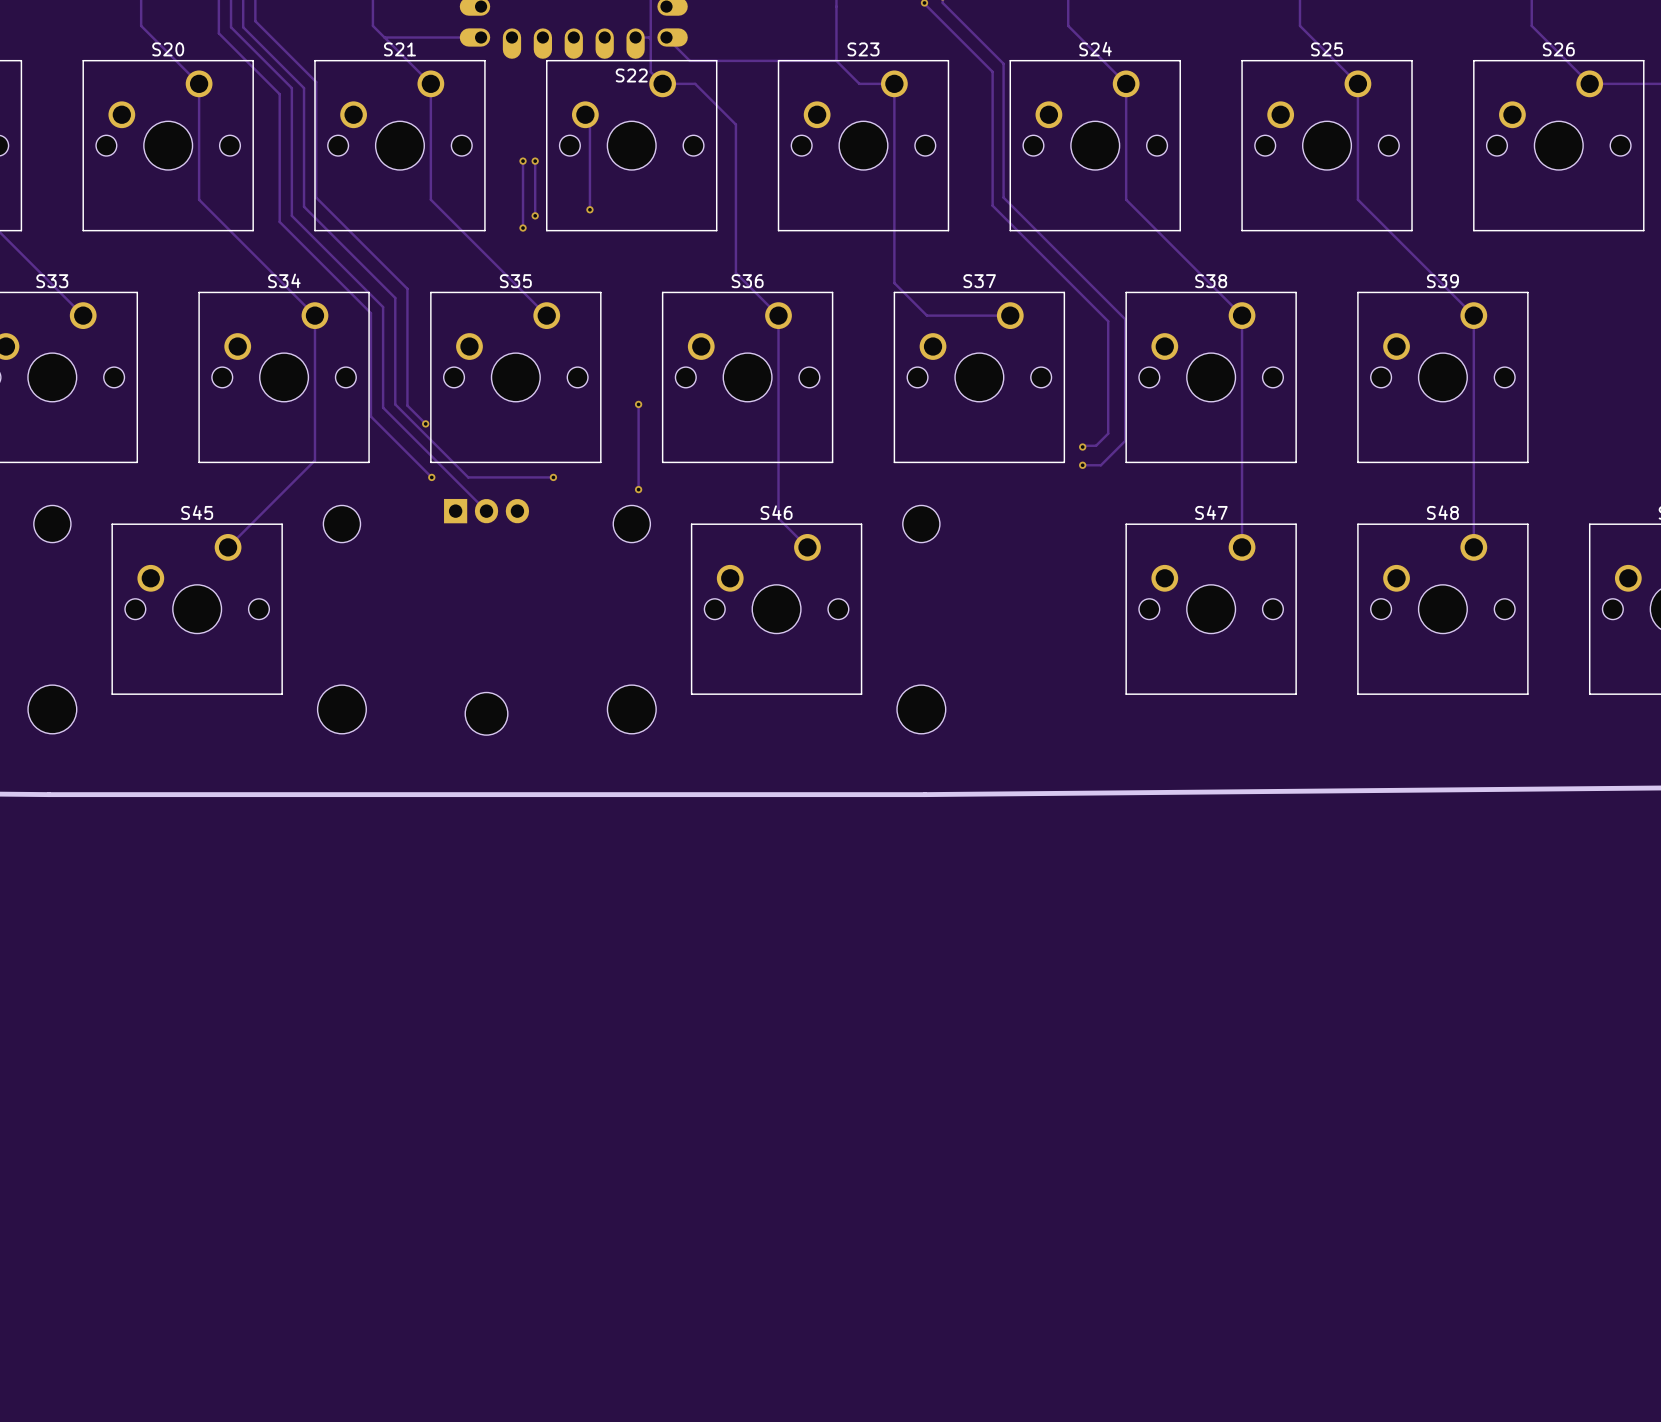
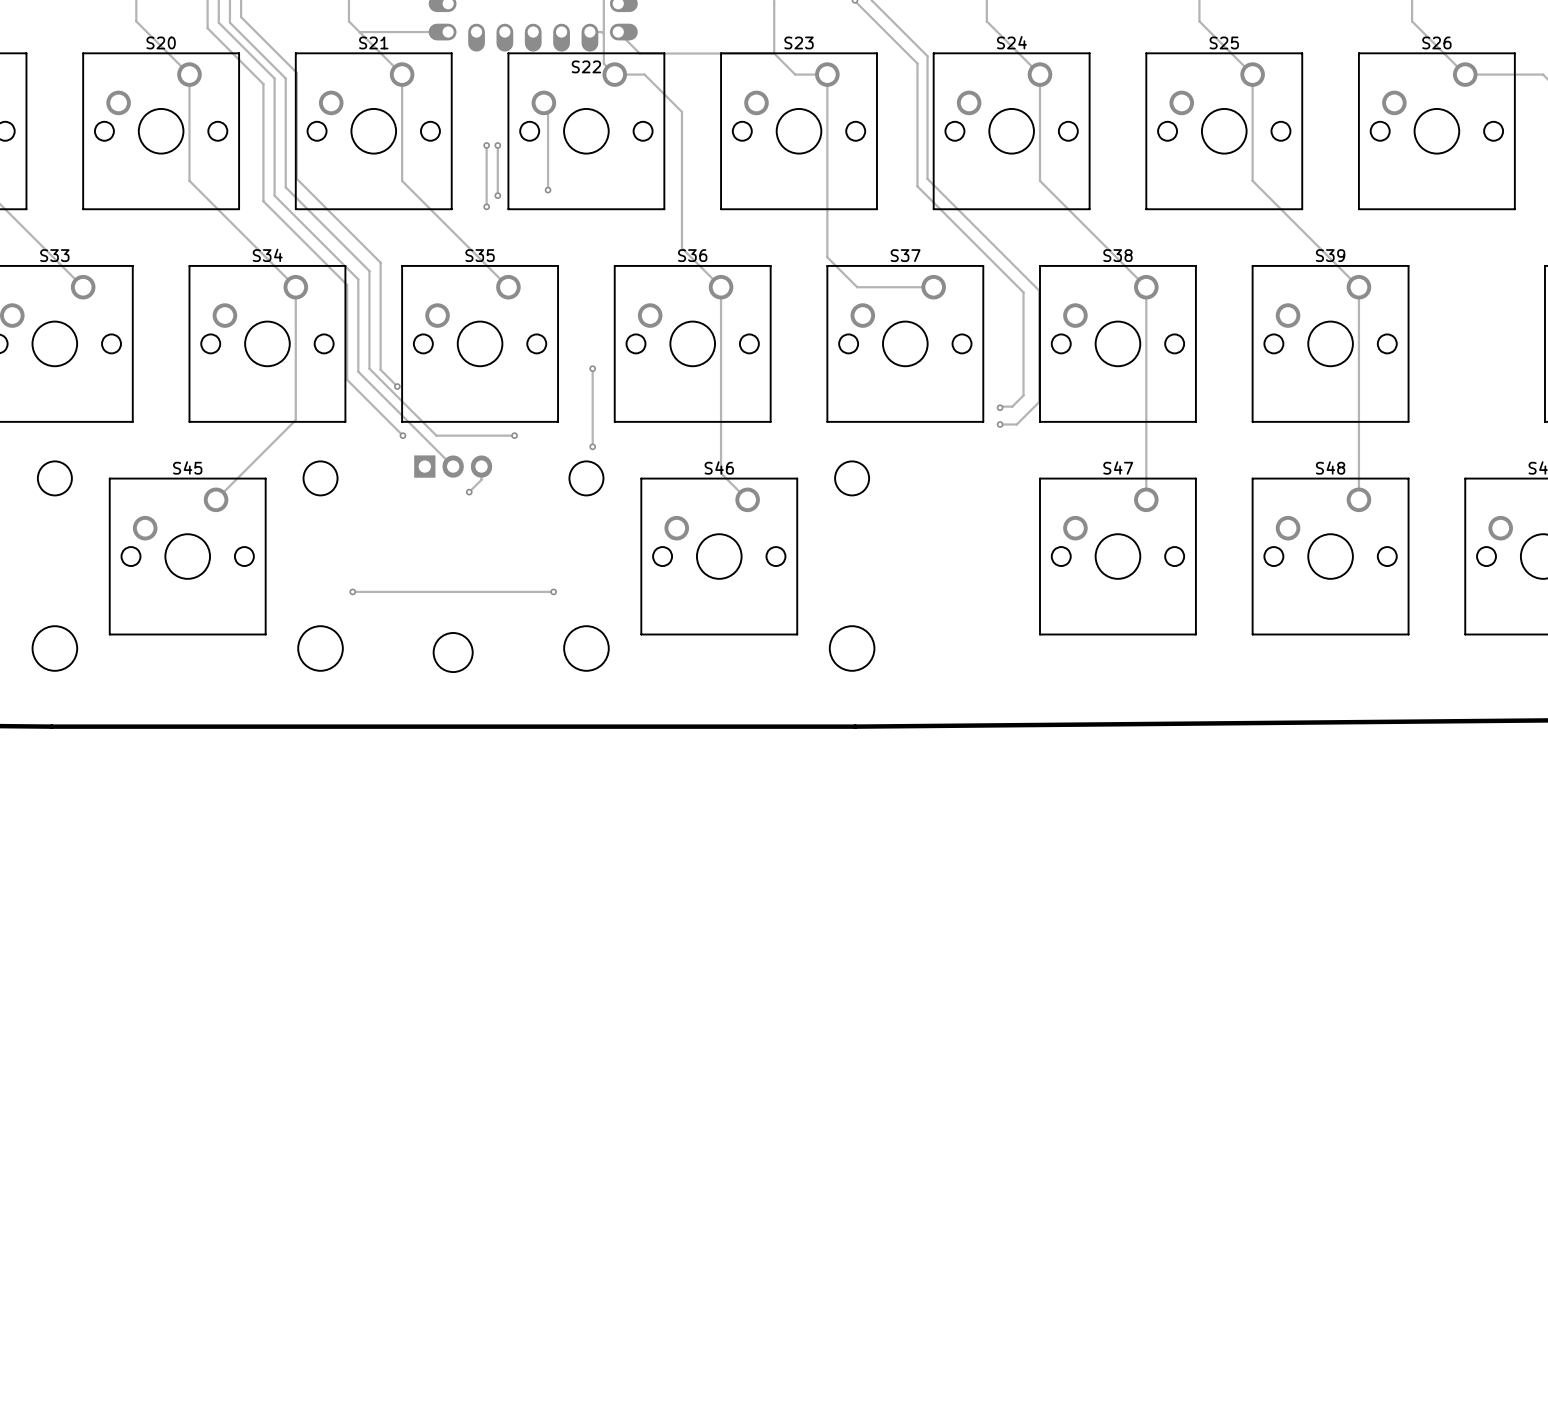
track: none -> (481, 466) (481, 479) (469, 492)
via: none -> (469, 492)
track: none -> (352, 591) (553, 591)
via: none -> (352, 591)
via: none -> (553, 591)

